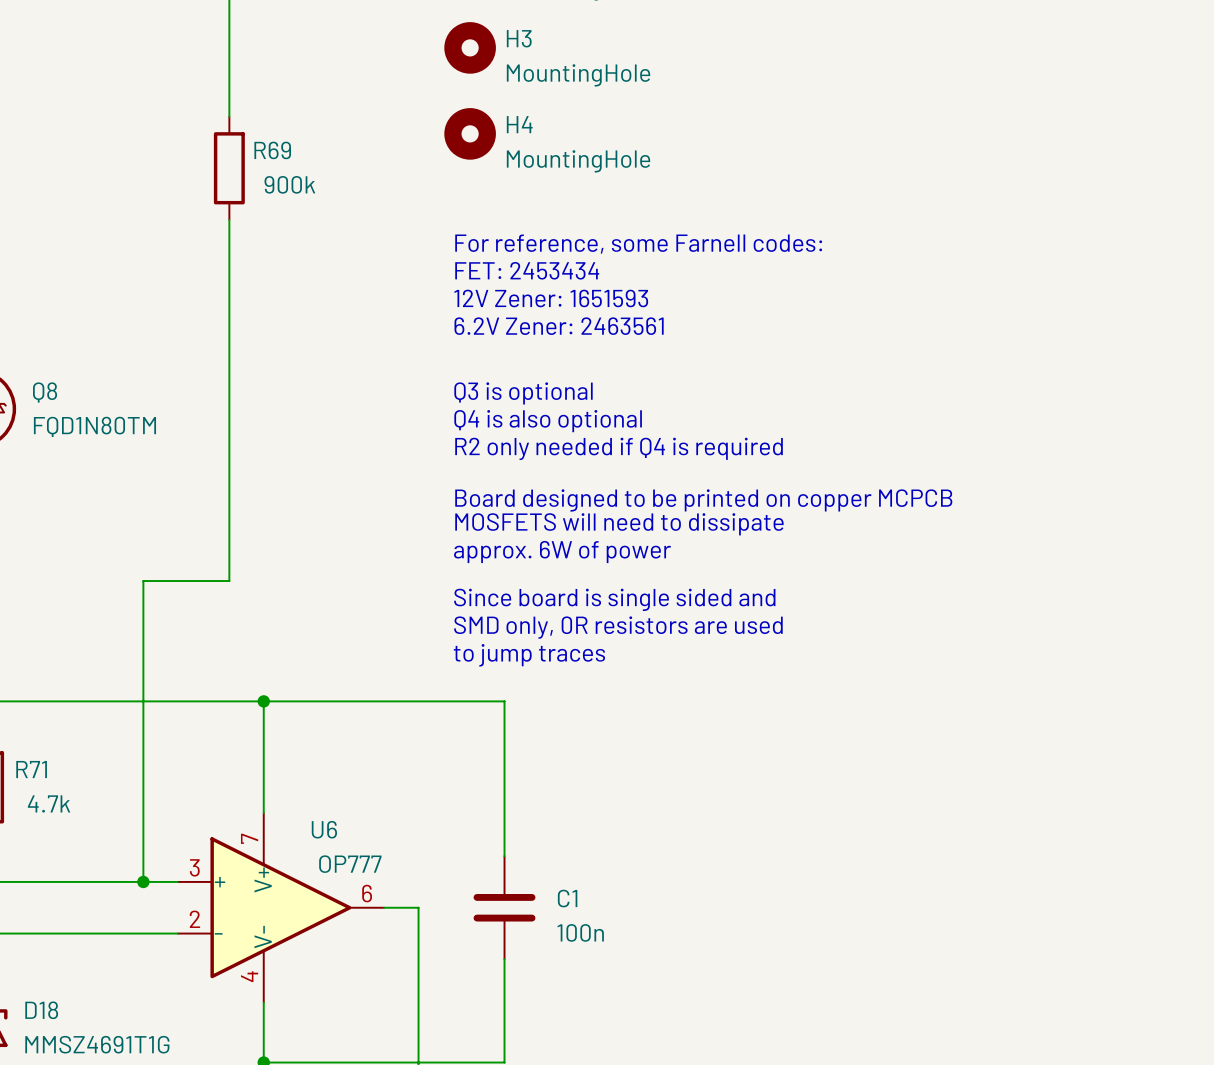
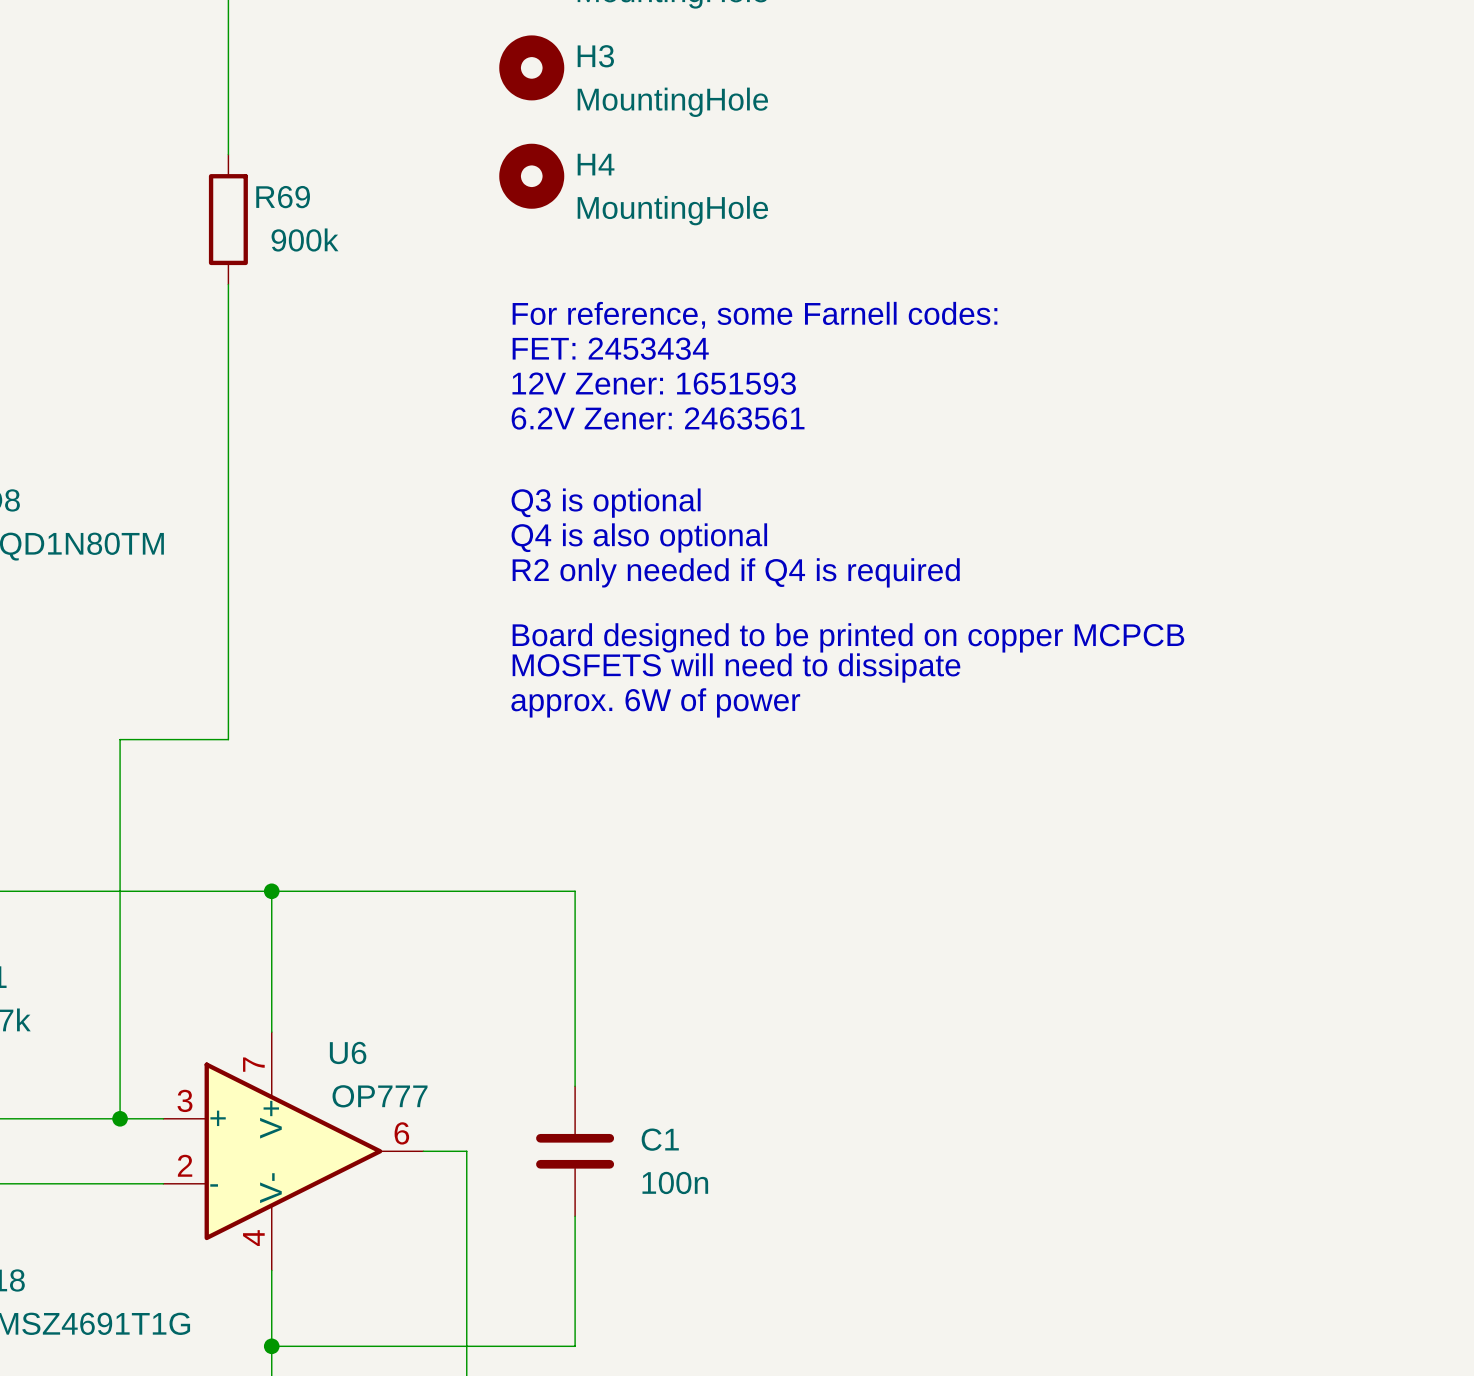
text: Since board is single sided and (614, 599) -> none
text: SMD only, 0R resistors are used (618, 627) -> none
text: to jump traces (529, 655) -> none

